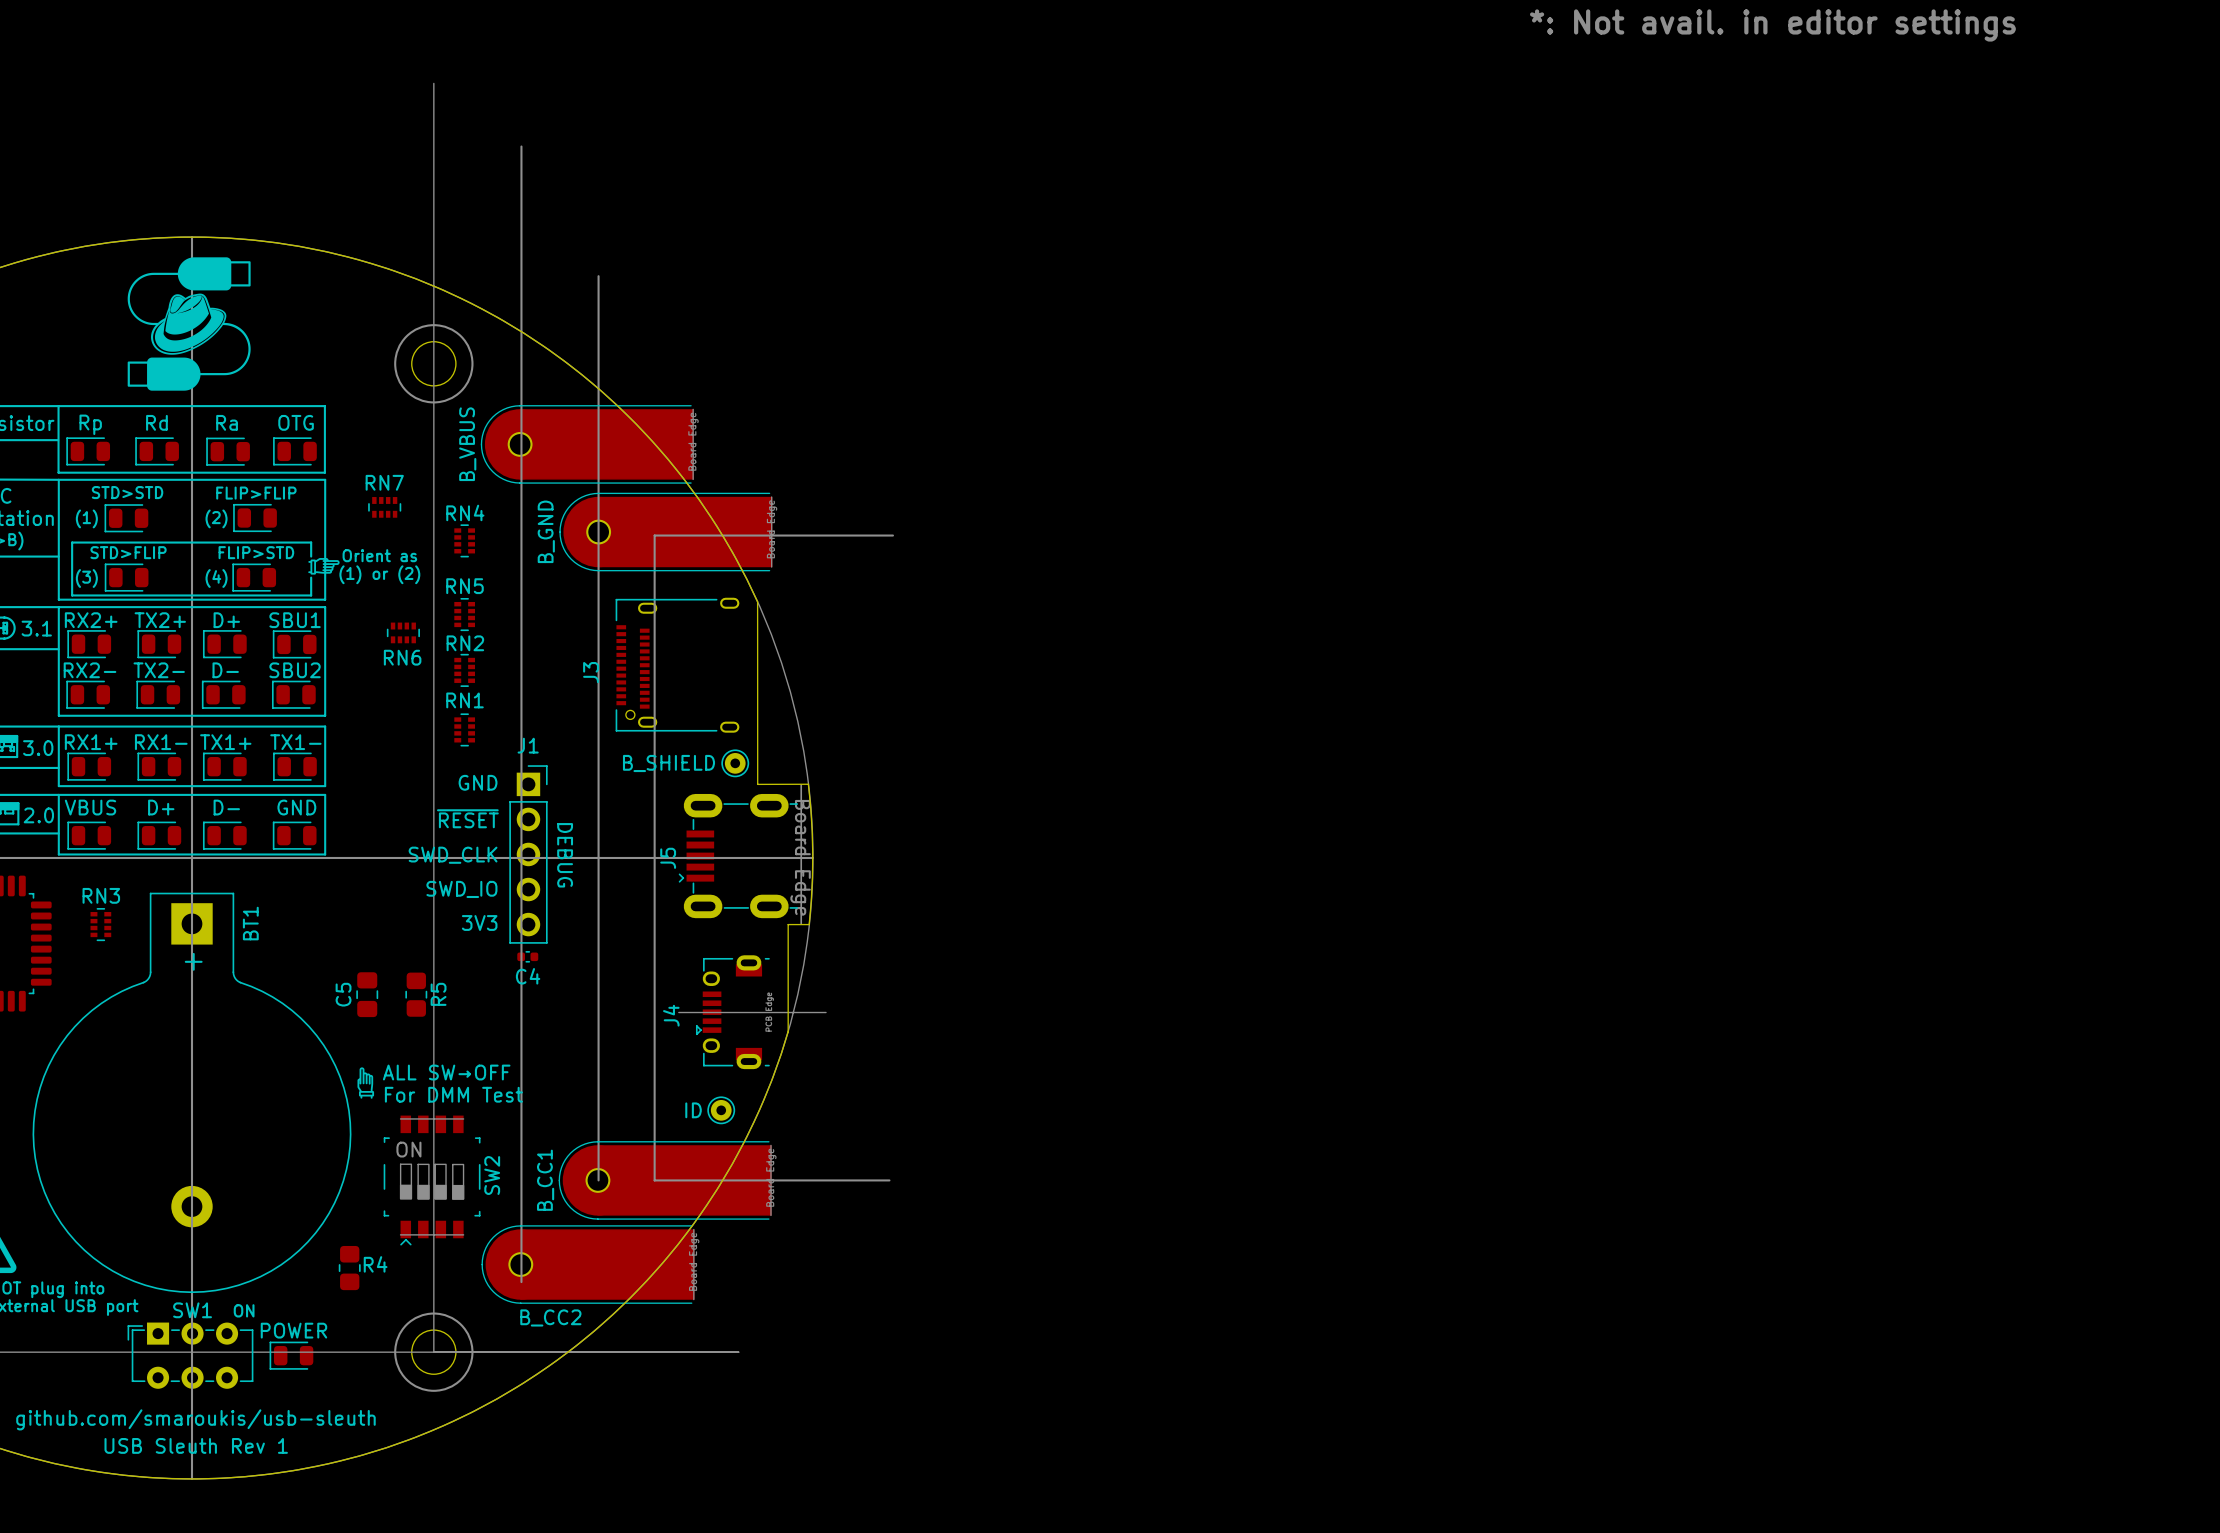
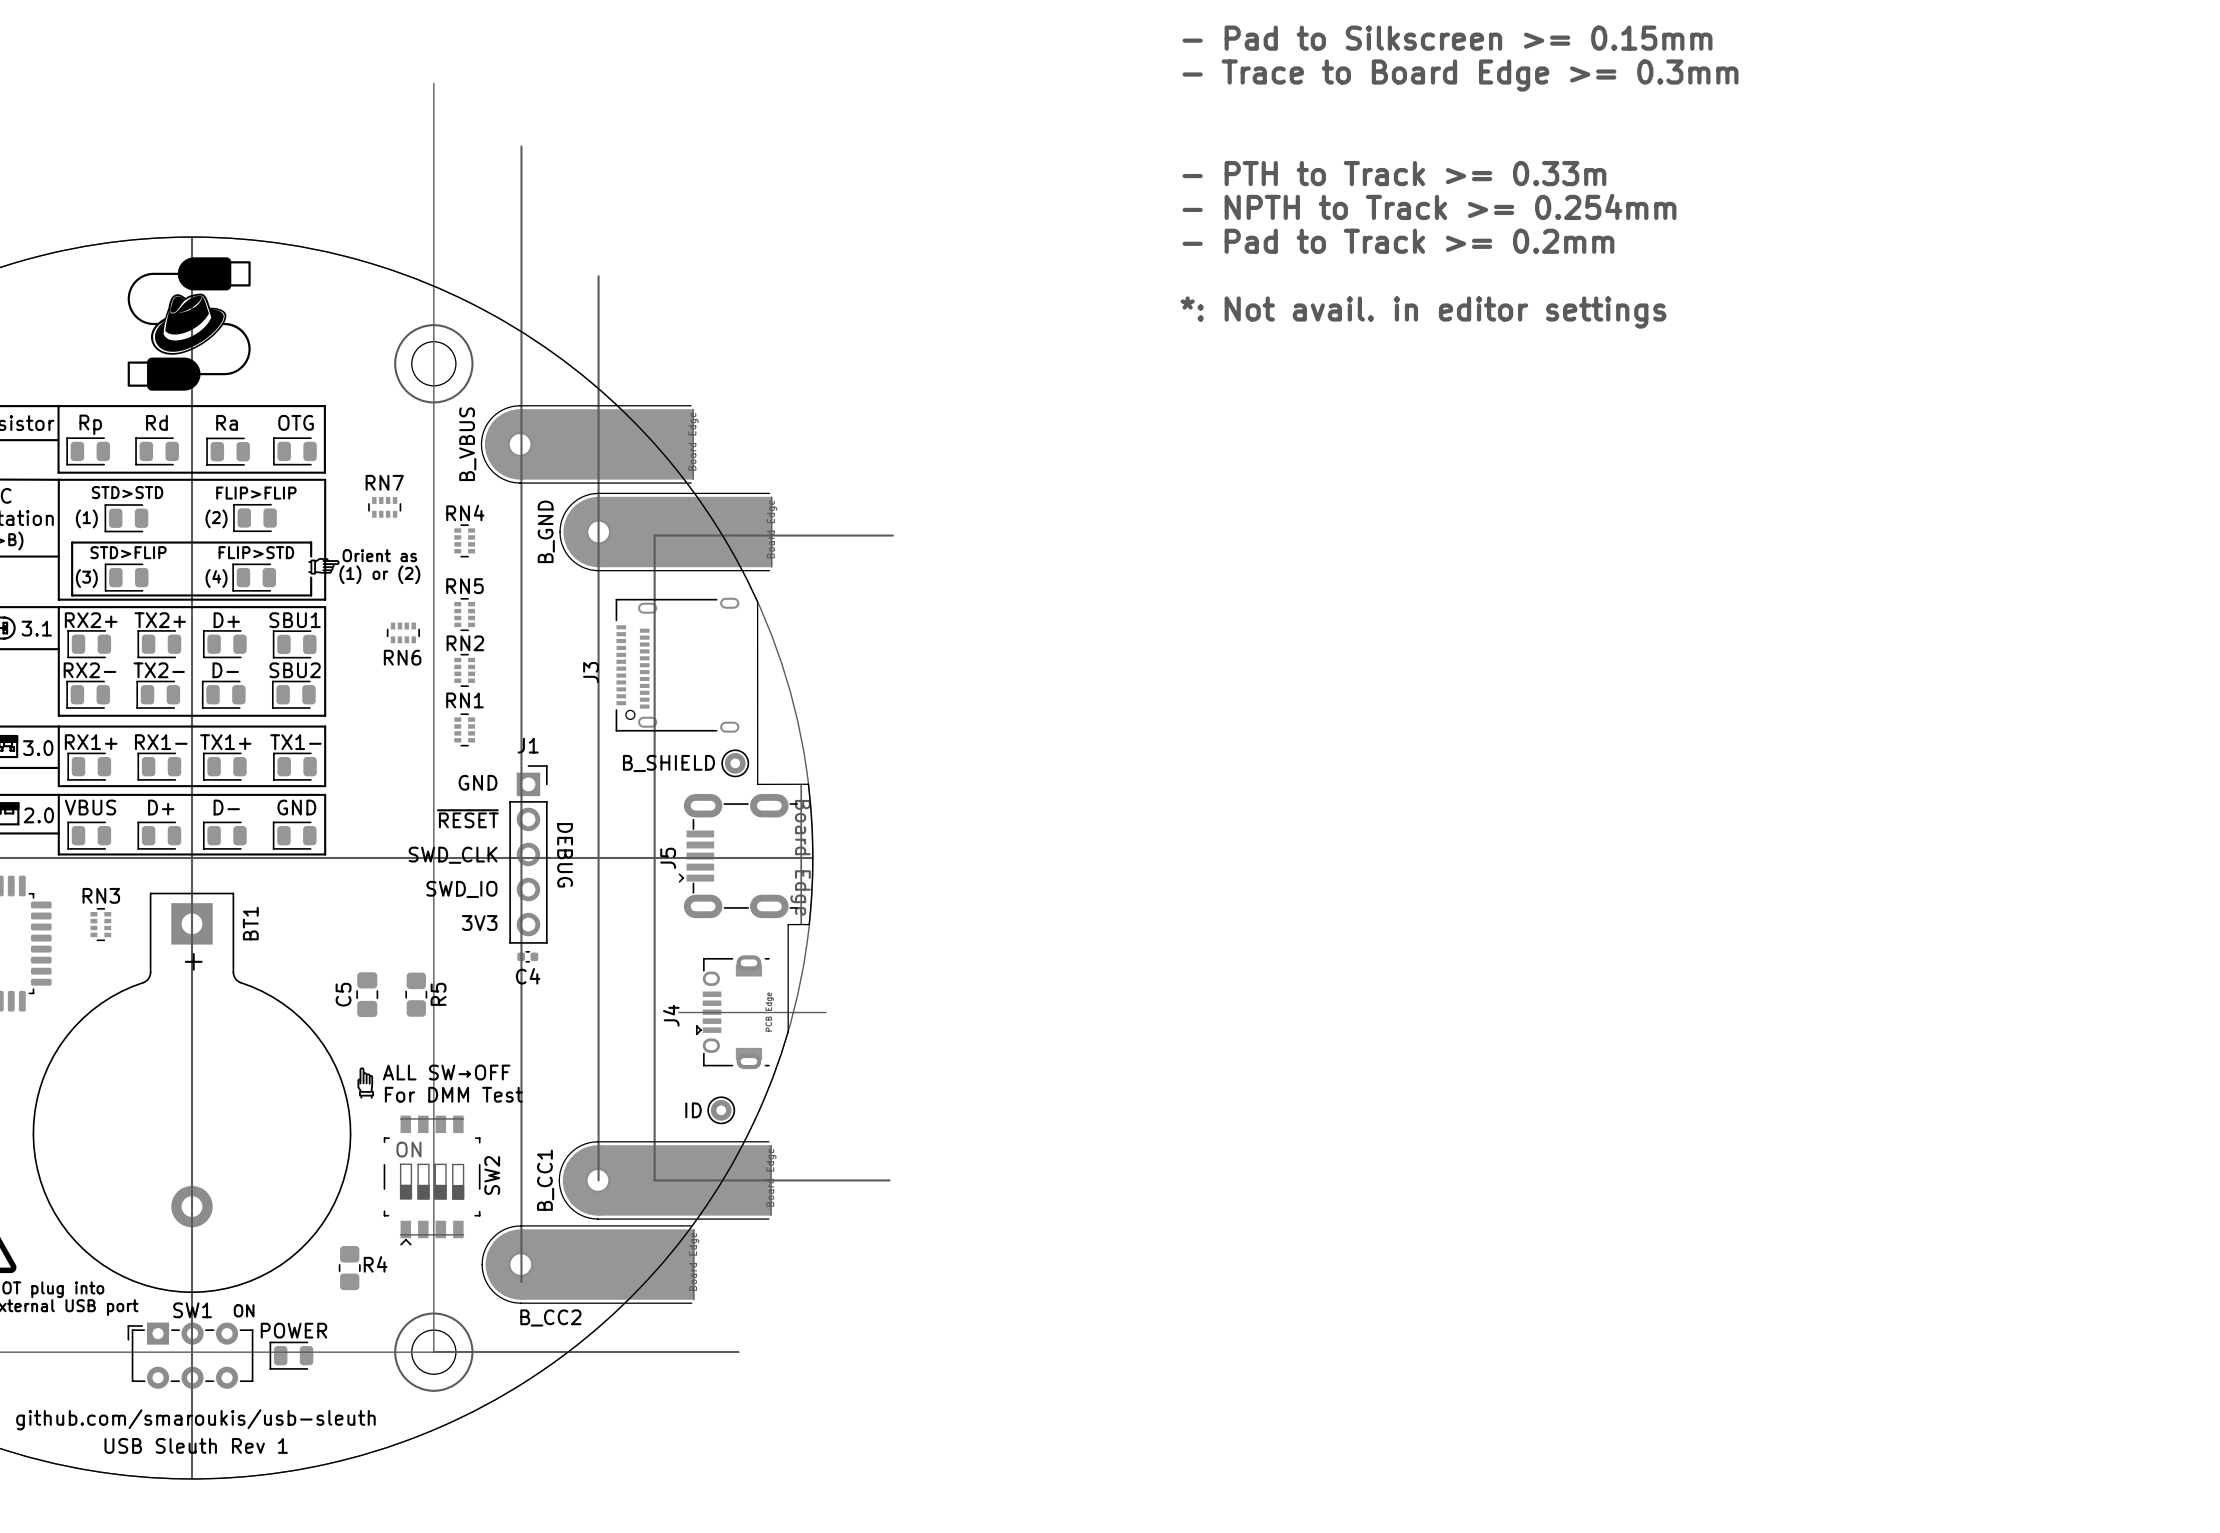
text: *: Not avail. in editor settings (1772, 25) -> none
text: none -> - Pad to Silkscreen >= 0.15mm (1447, 38)
text: none -> - Trace to Board Edge >= 0.3mm (1460, 75)
text: none -> - PTH to Track >= 0.33m (1394, 173)
text: none -> - NPTH to Track >= 0.254mm (1429, 206)
text: none -> - Pad to Track >= 0.2mm (1398, 241)
text: none -> *: Not avail. in editor settings (1423, 312)

